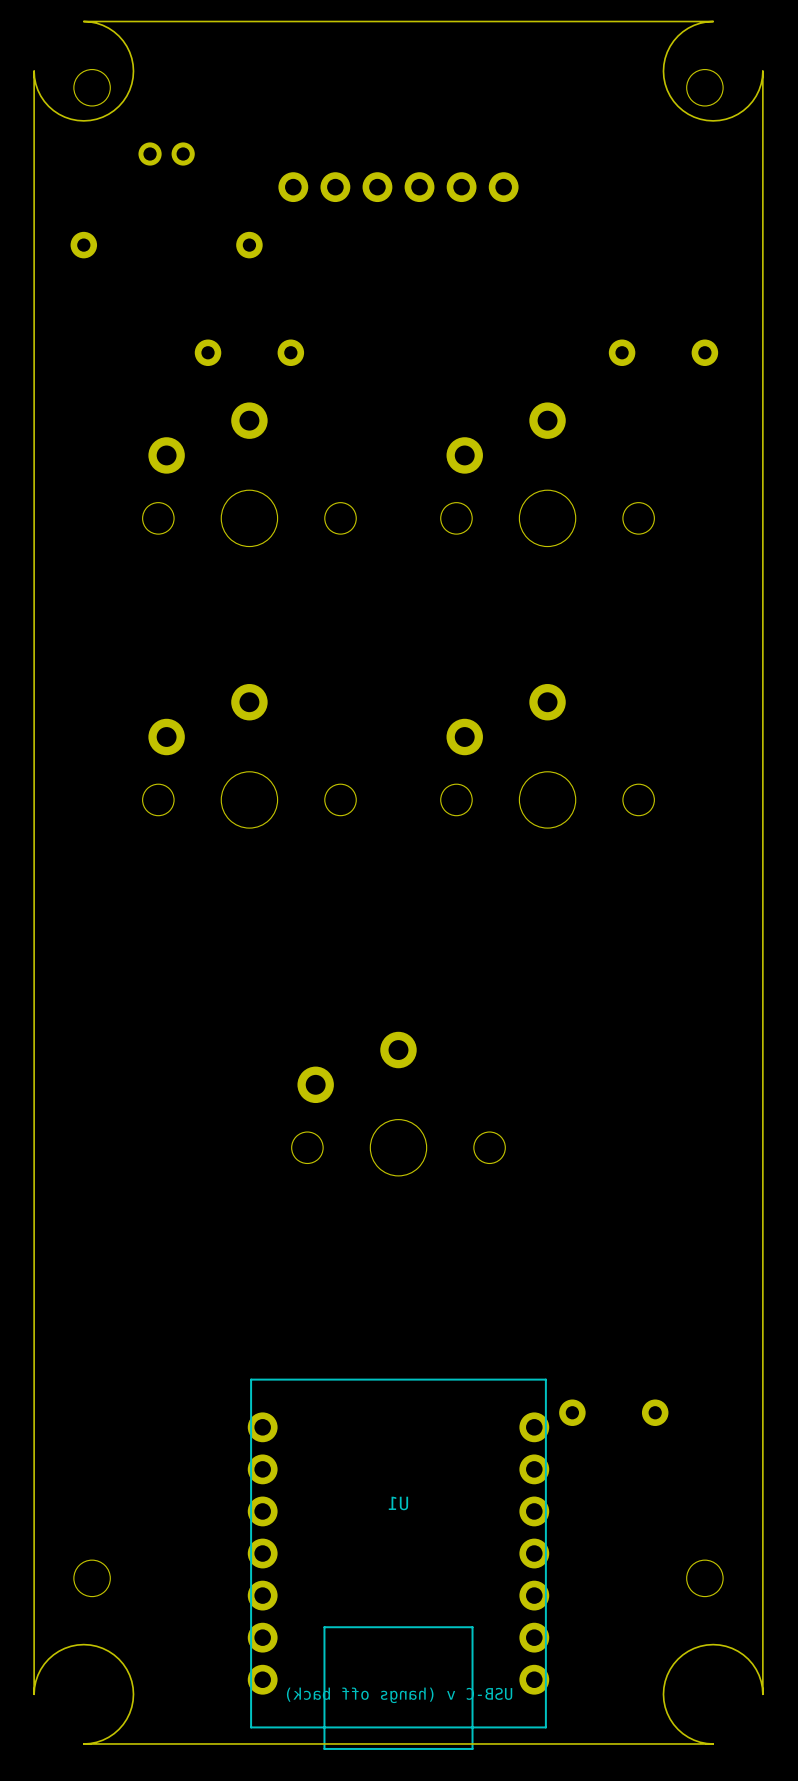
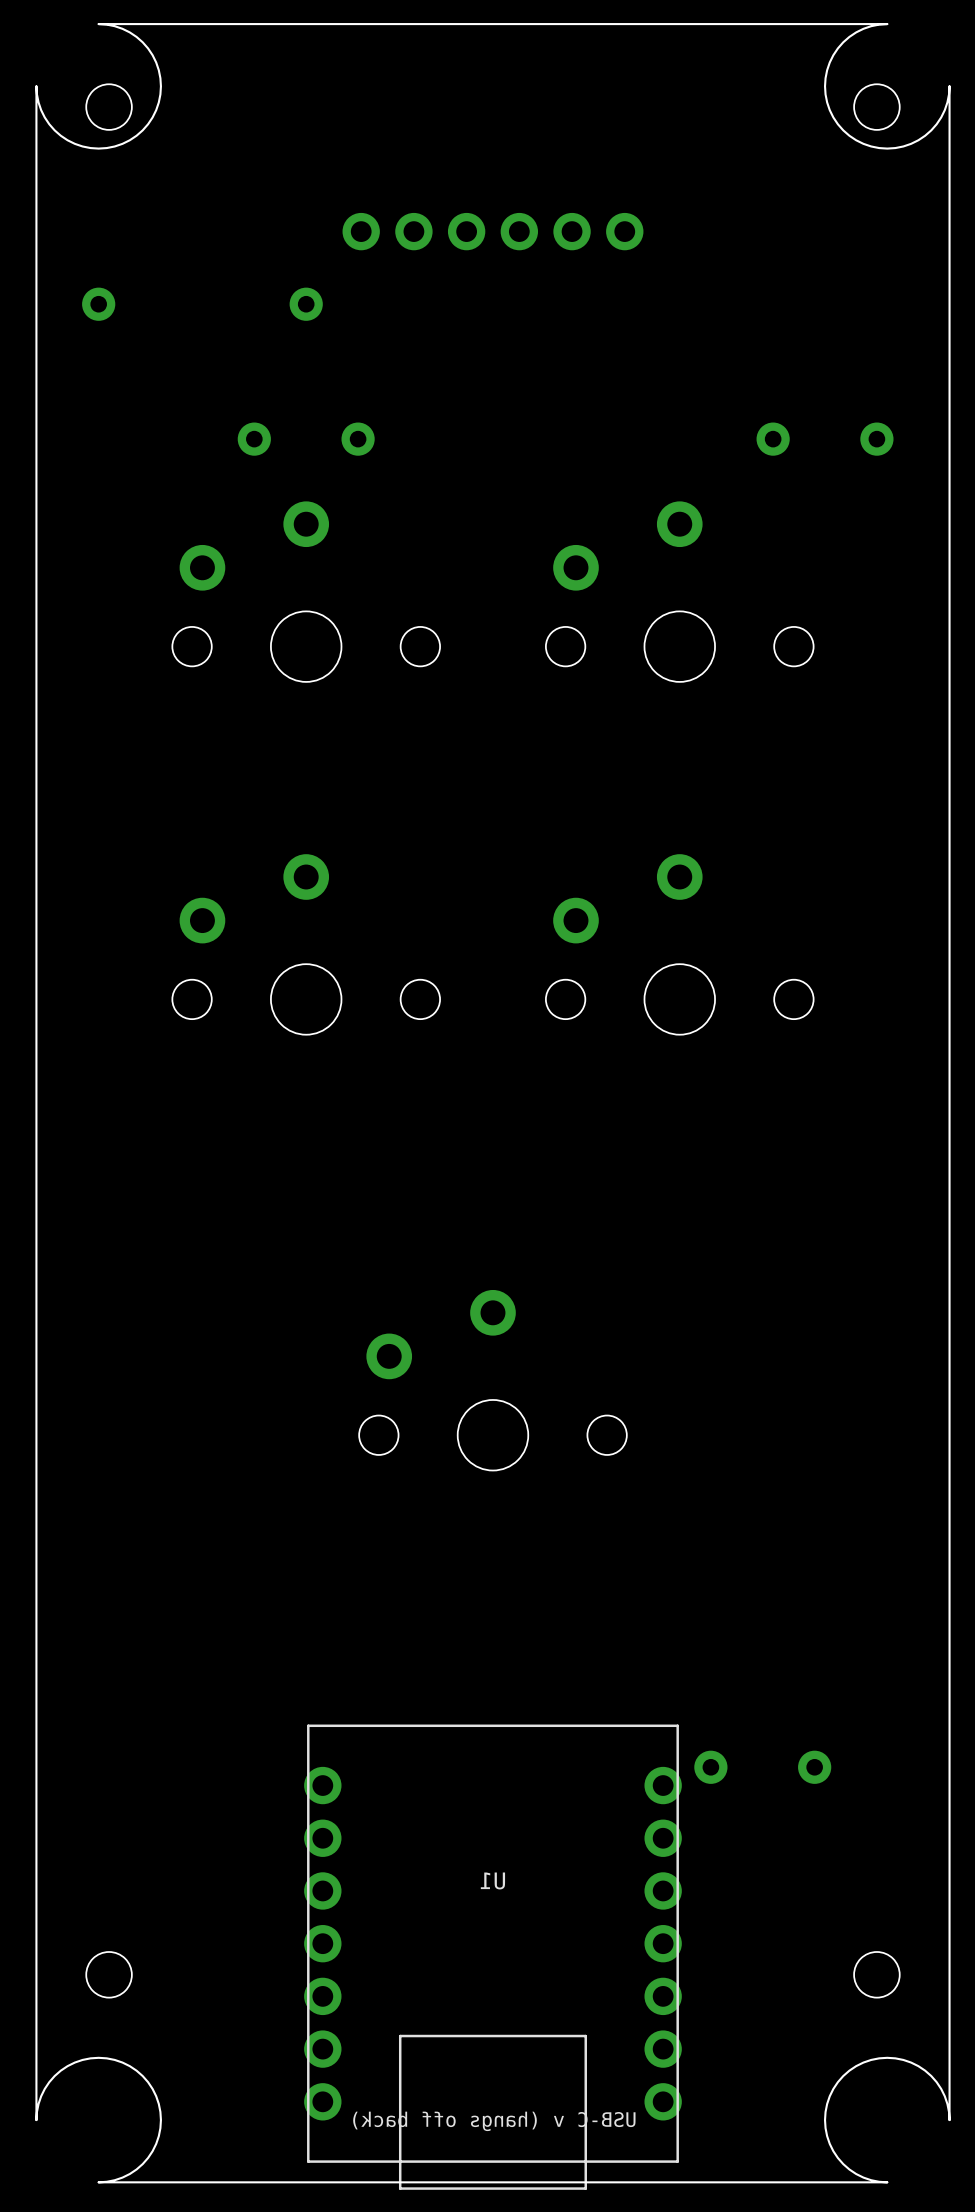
part: (166, 154) -> none

